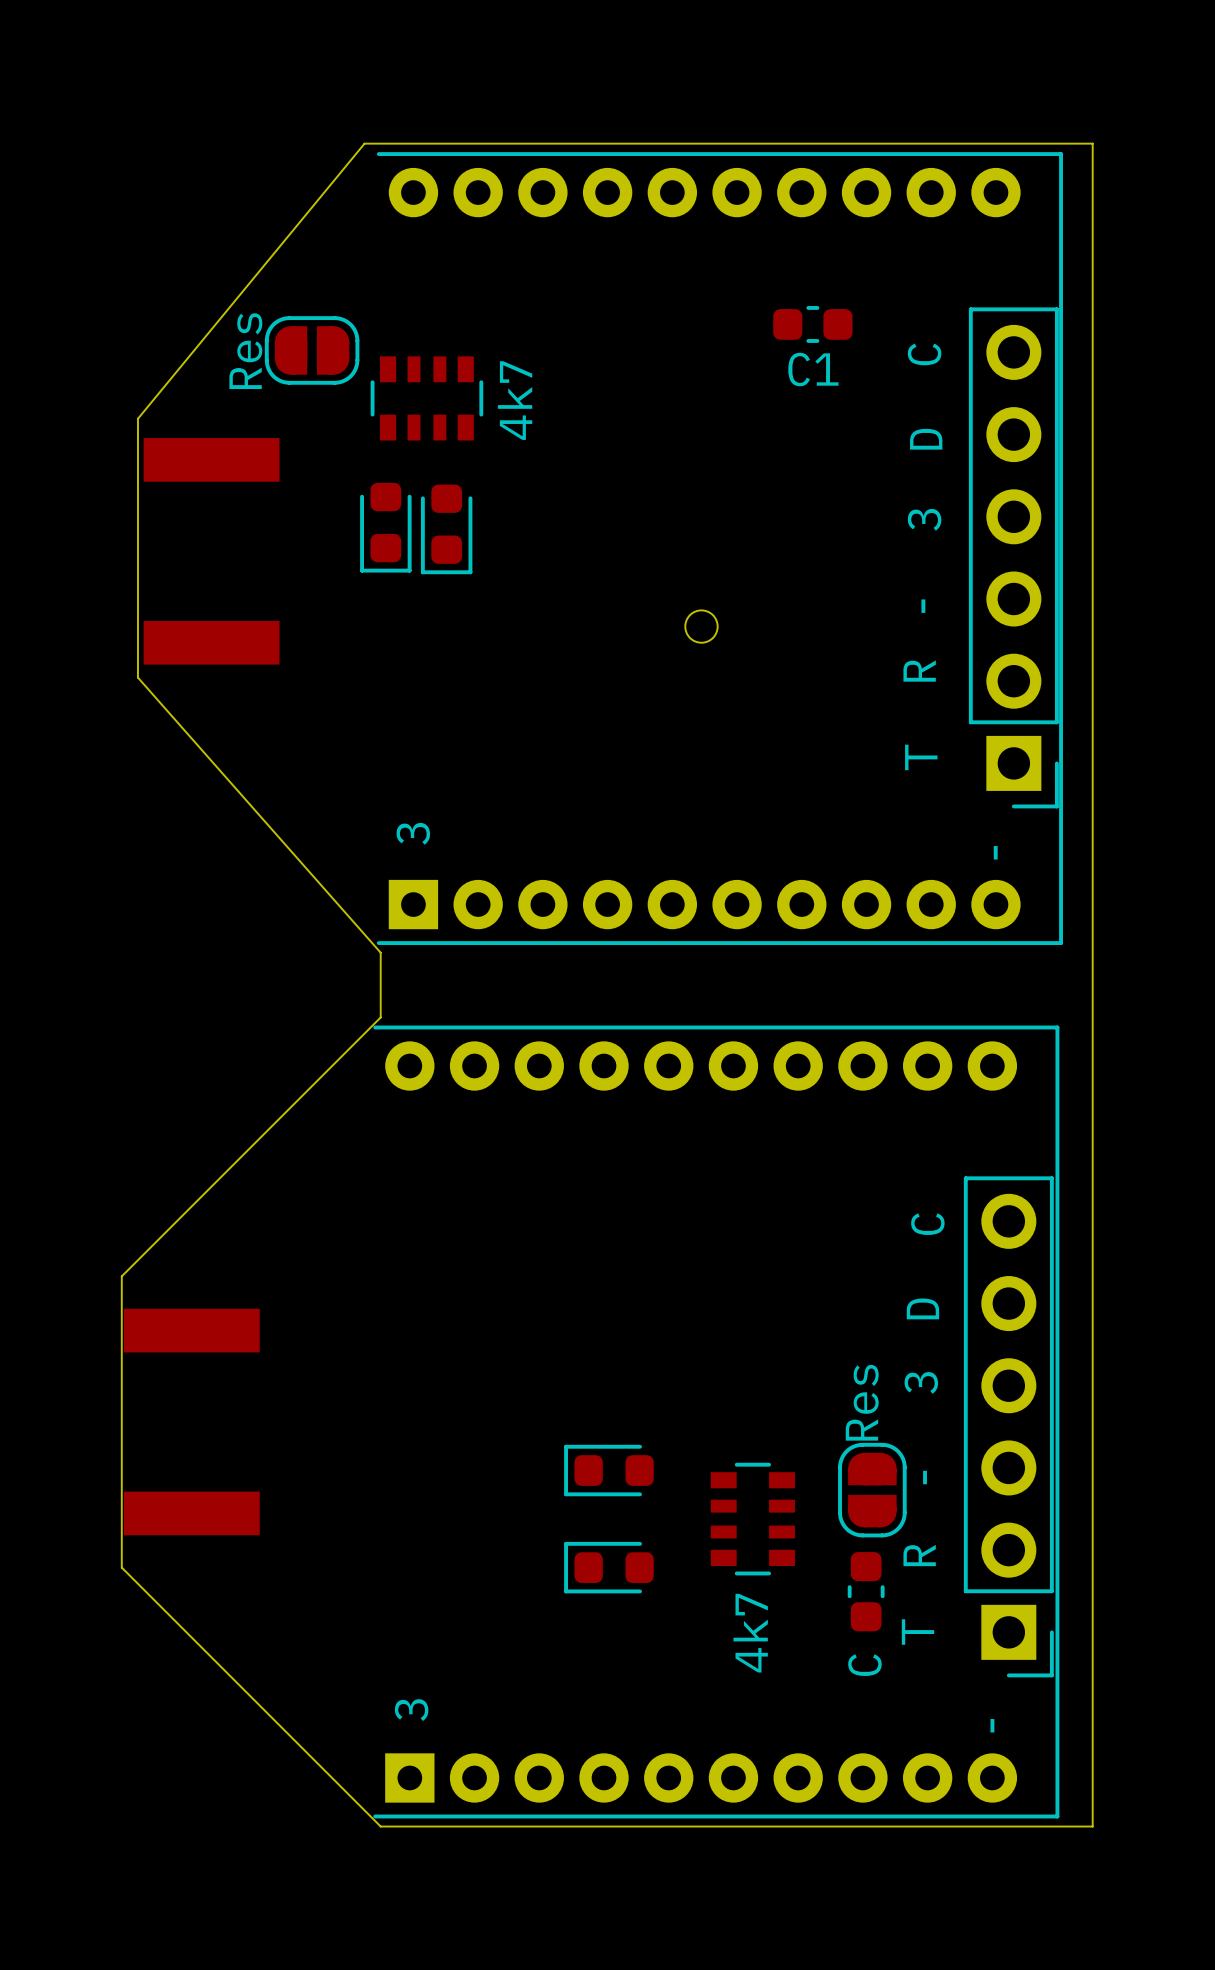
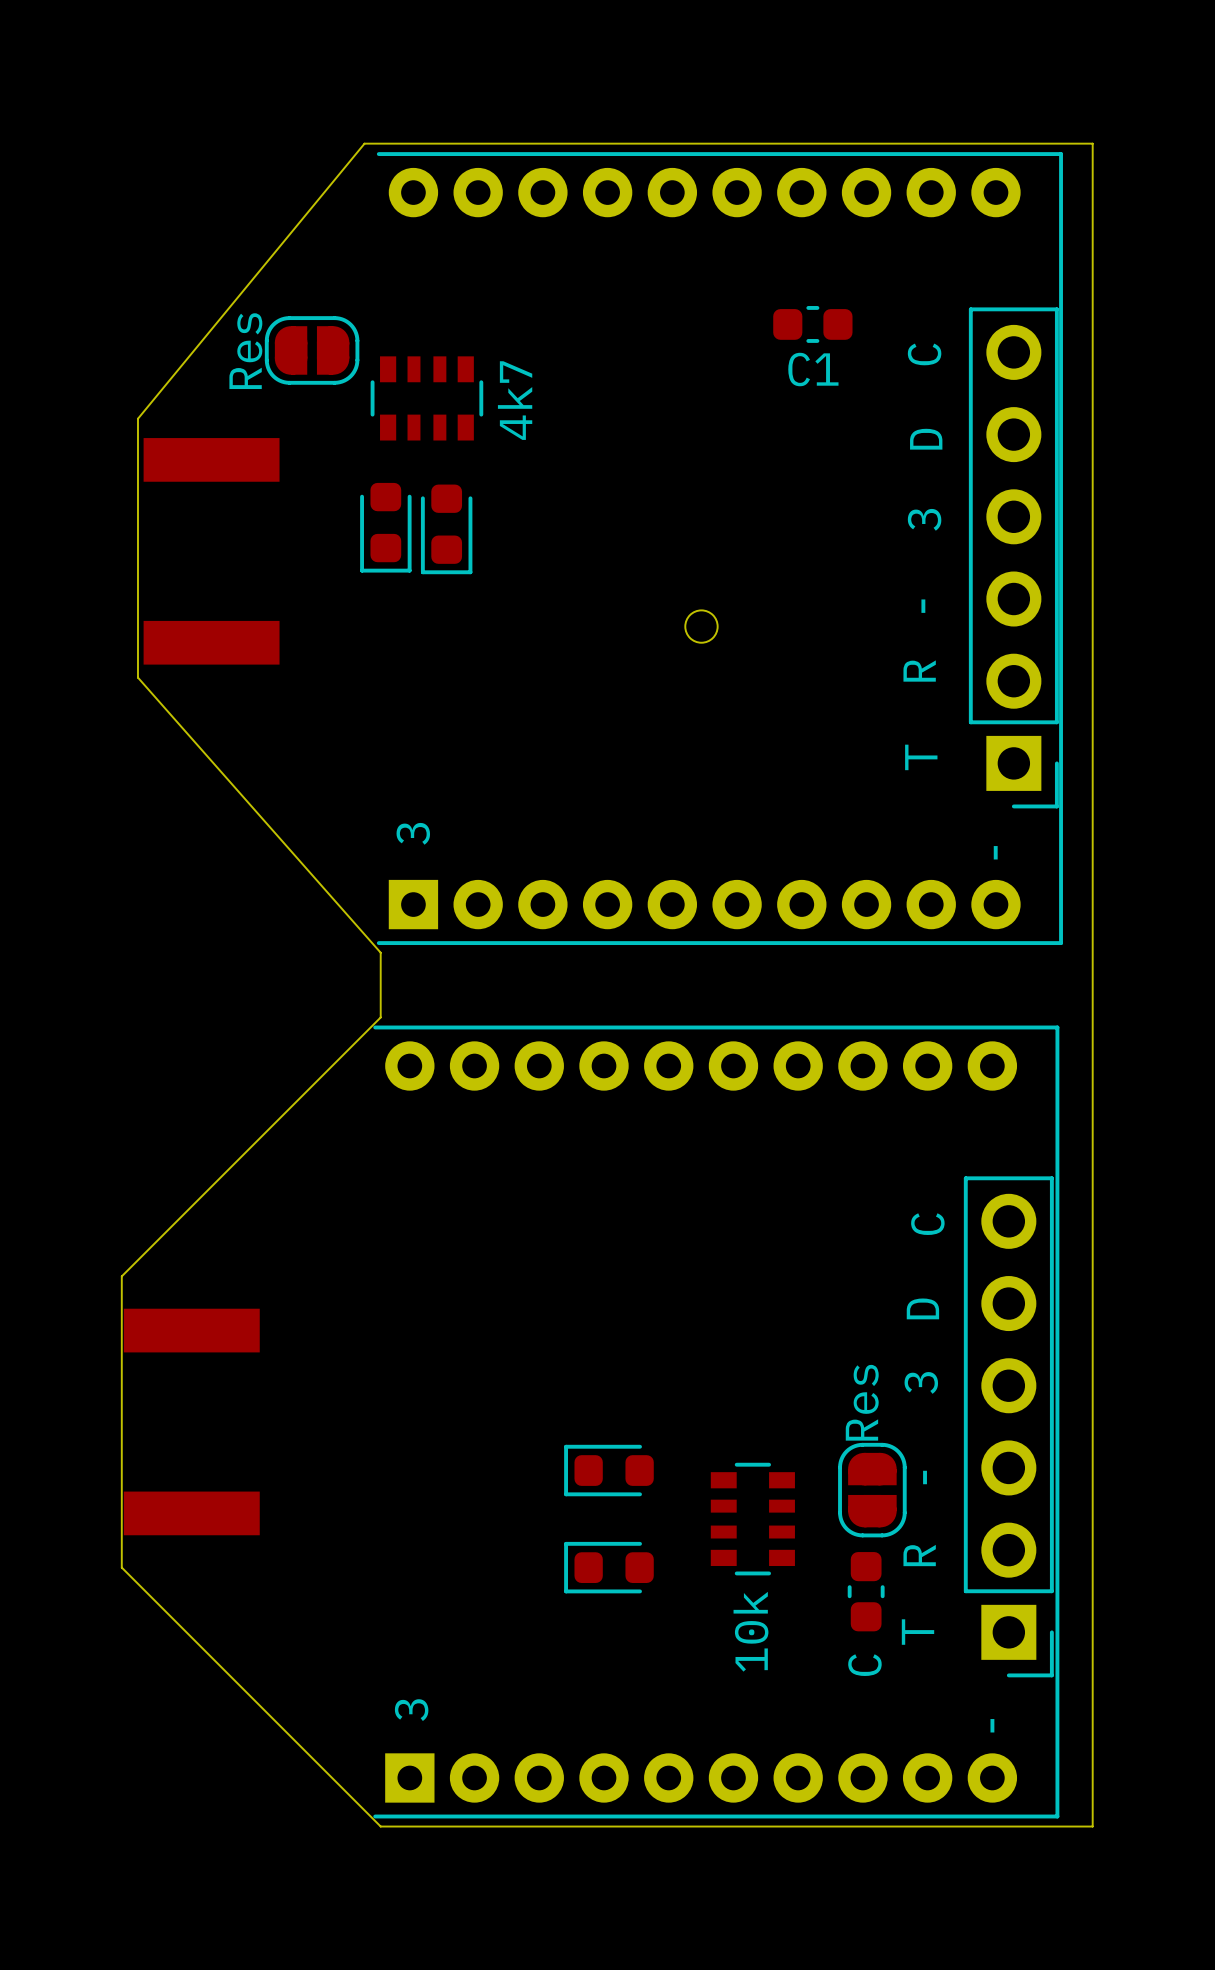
part value: 4k7 (750, 1633) -> 10k (750, 1631)

